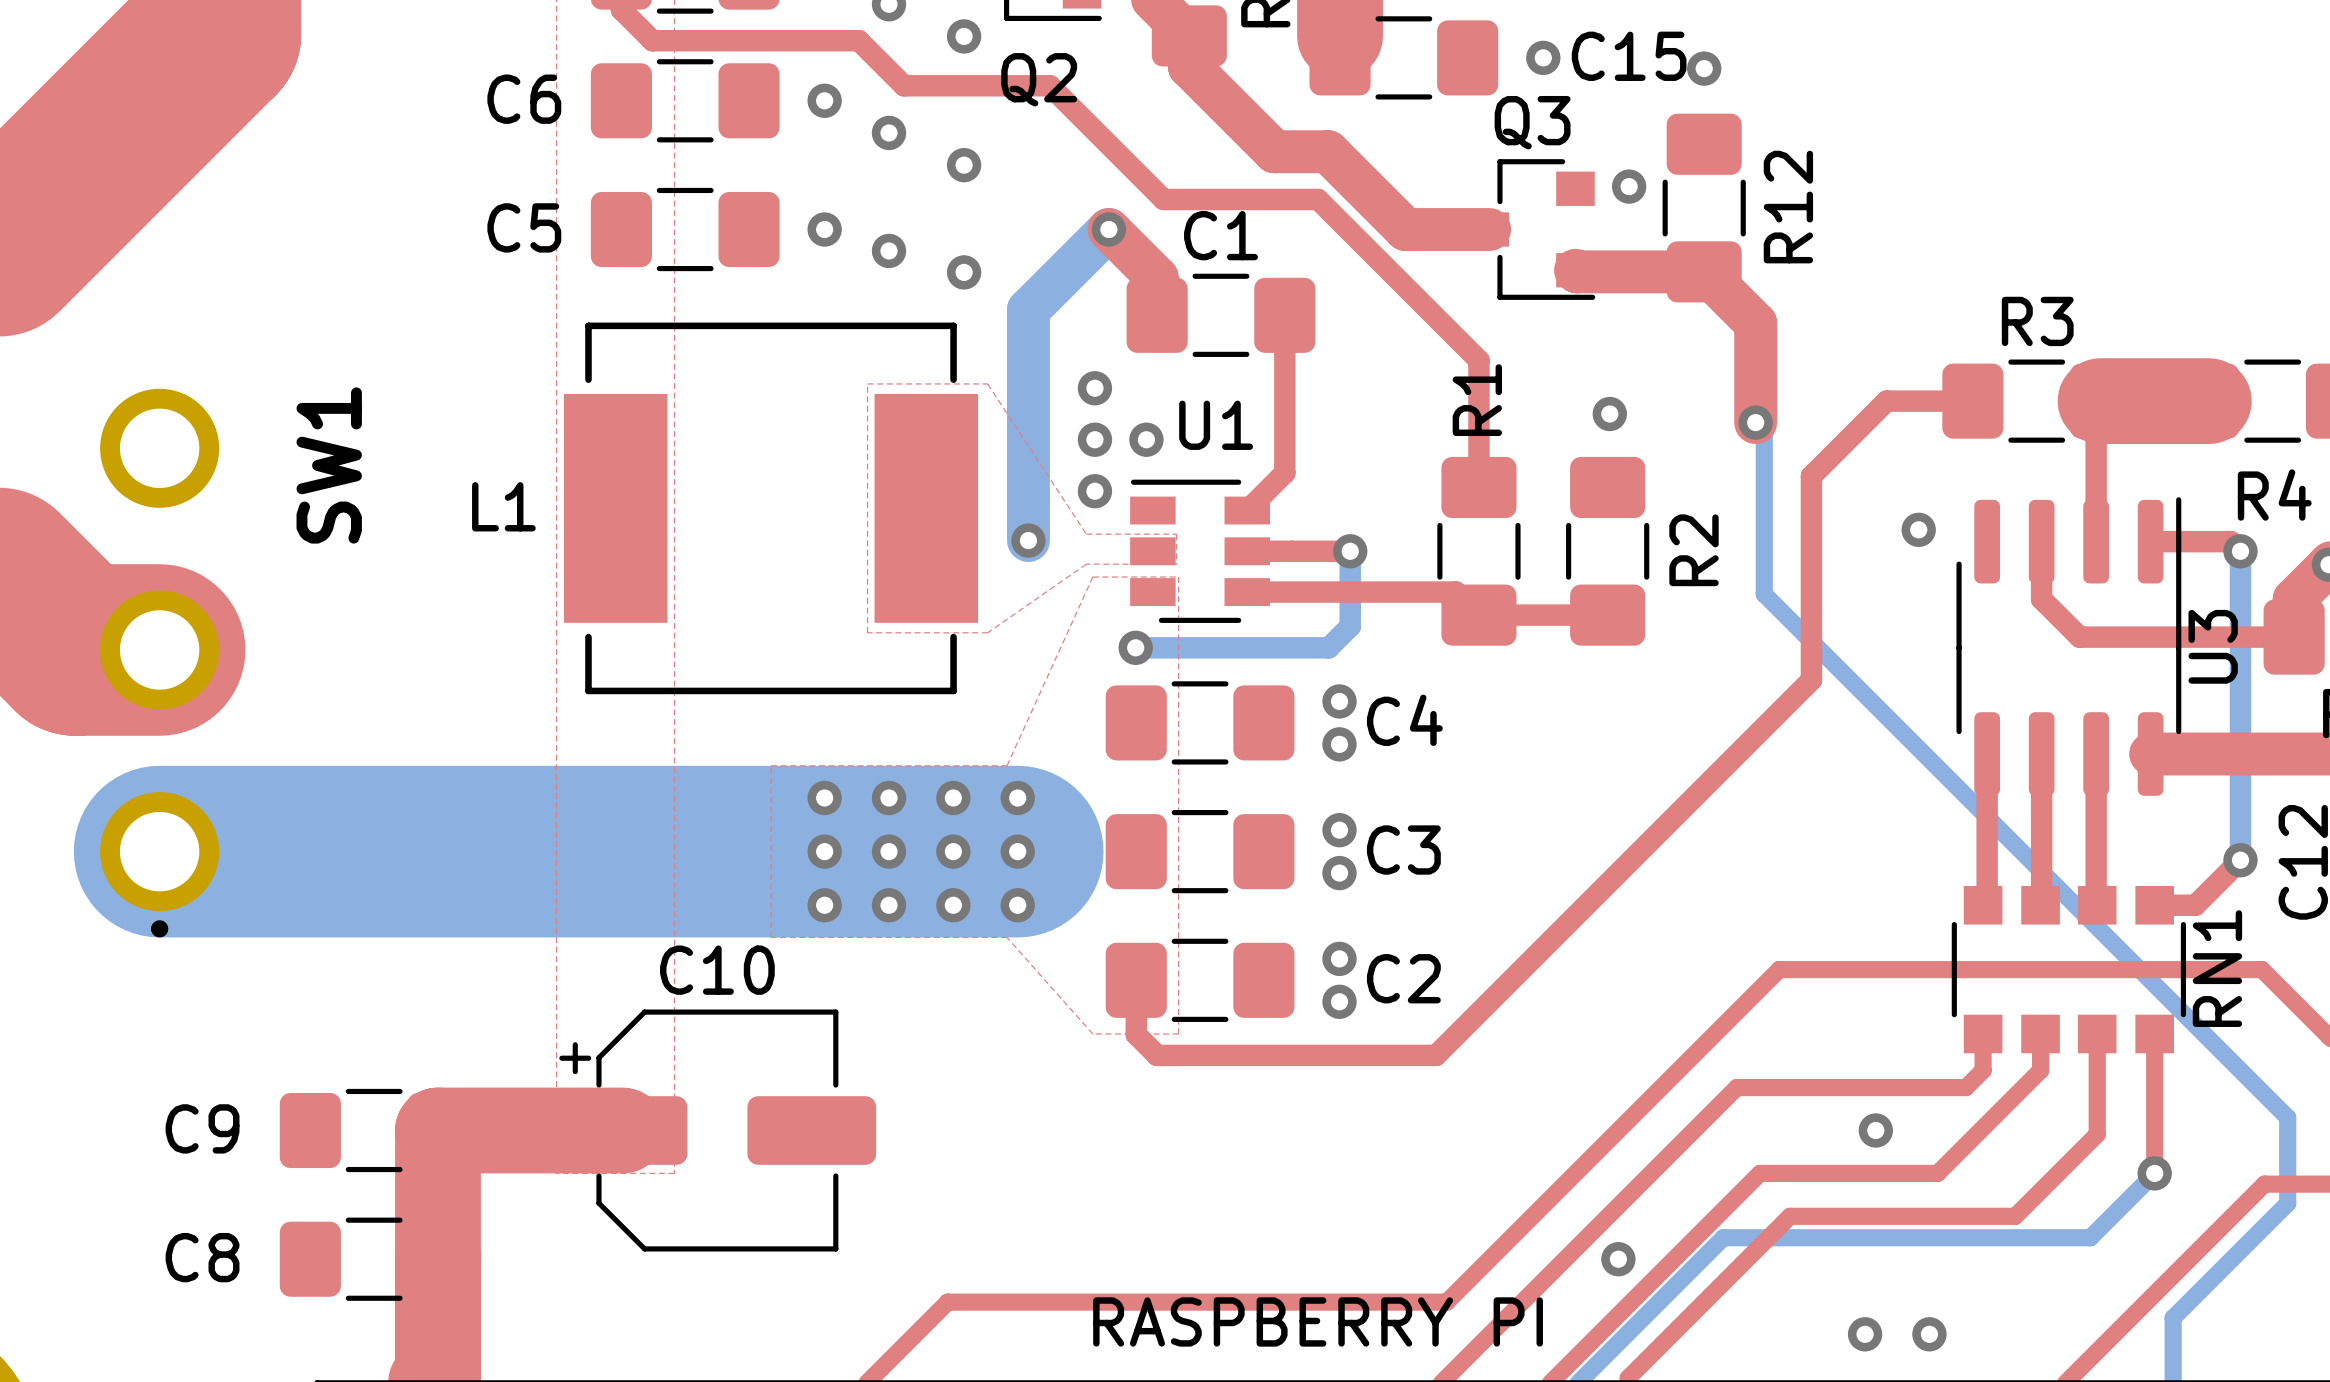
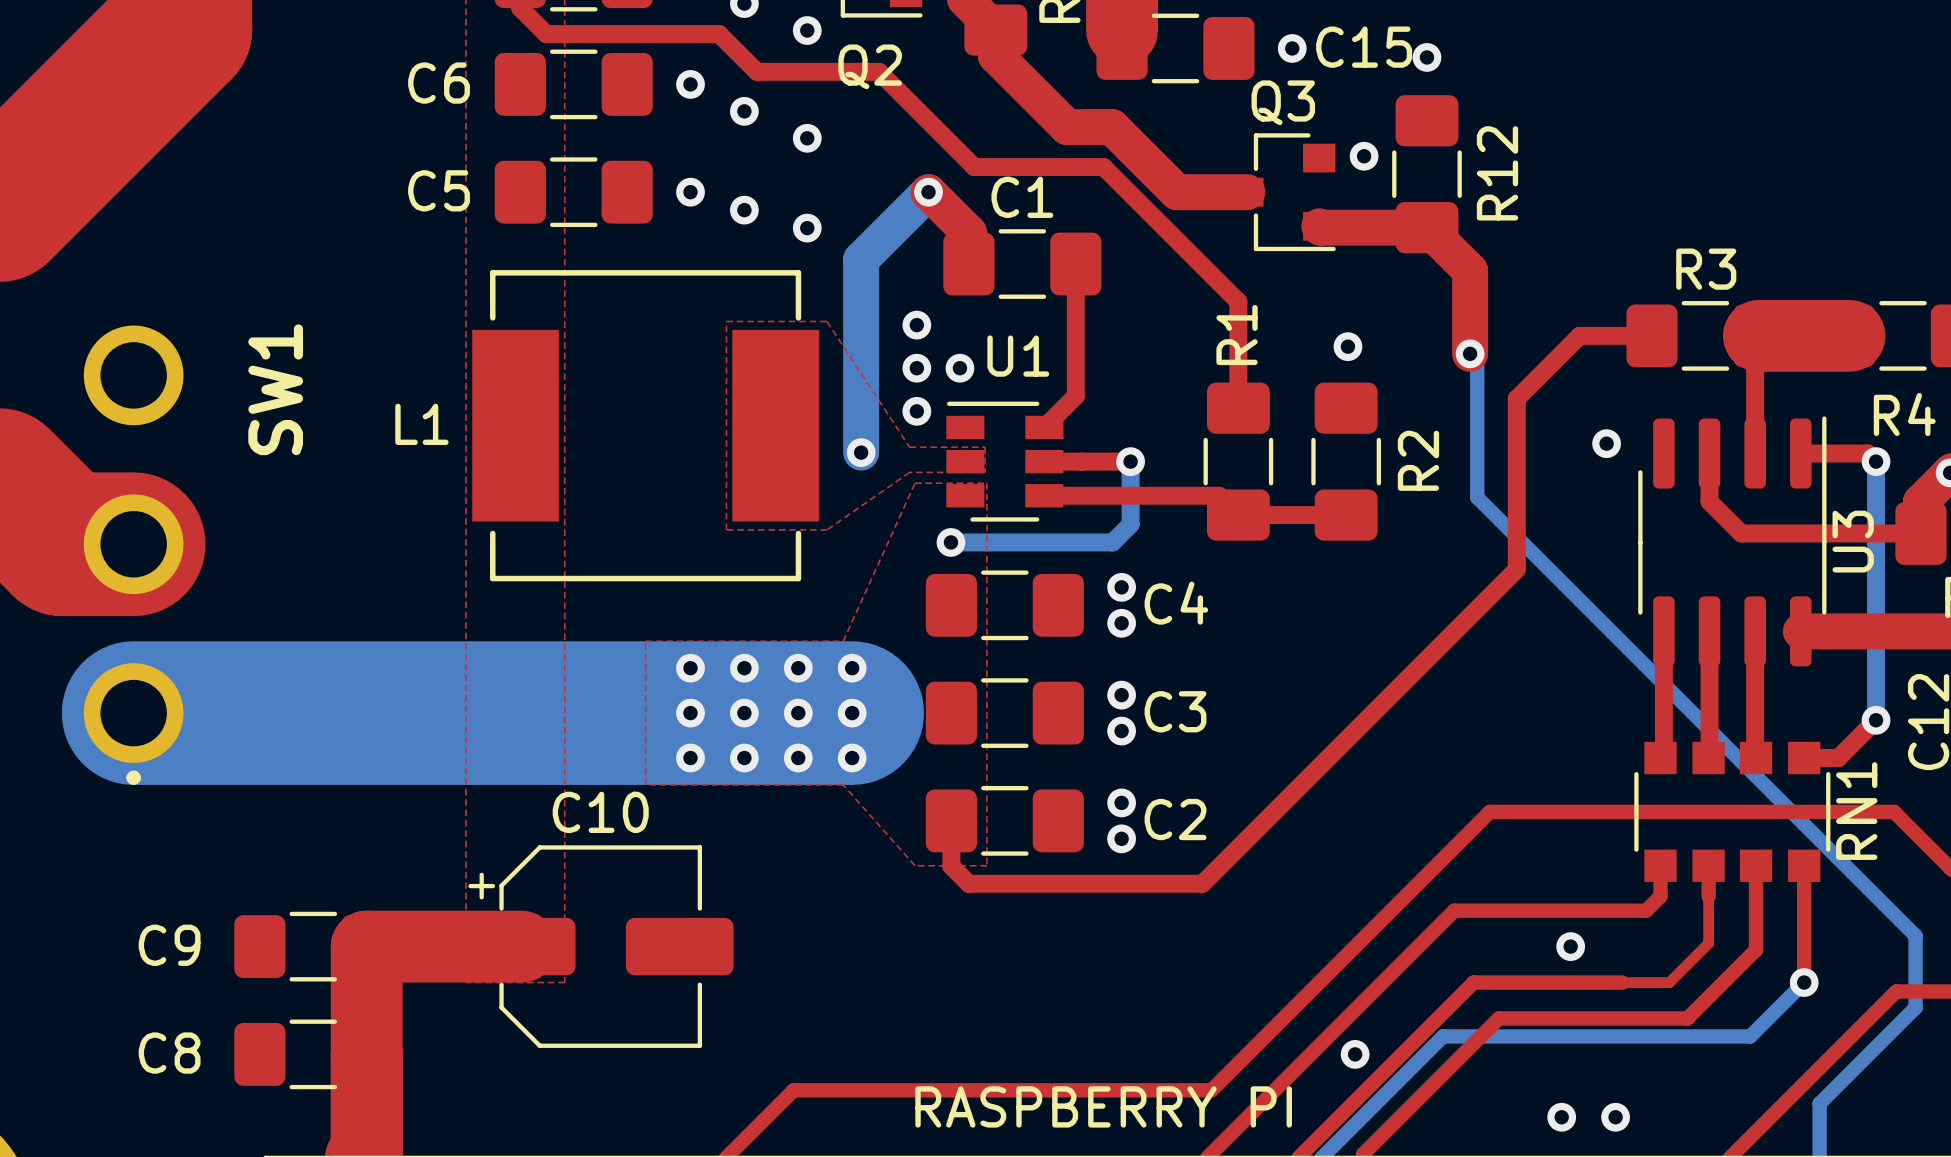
top track: (2040, 1070) (1937, 1173) -> (1708, 896) (1708, 943) (1669, 982) (1622, 982)

